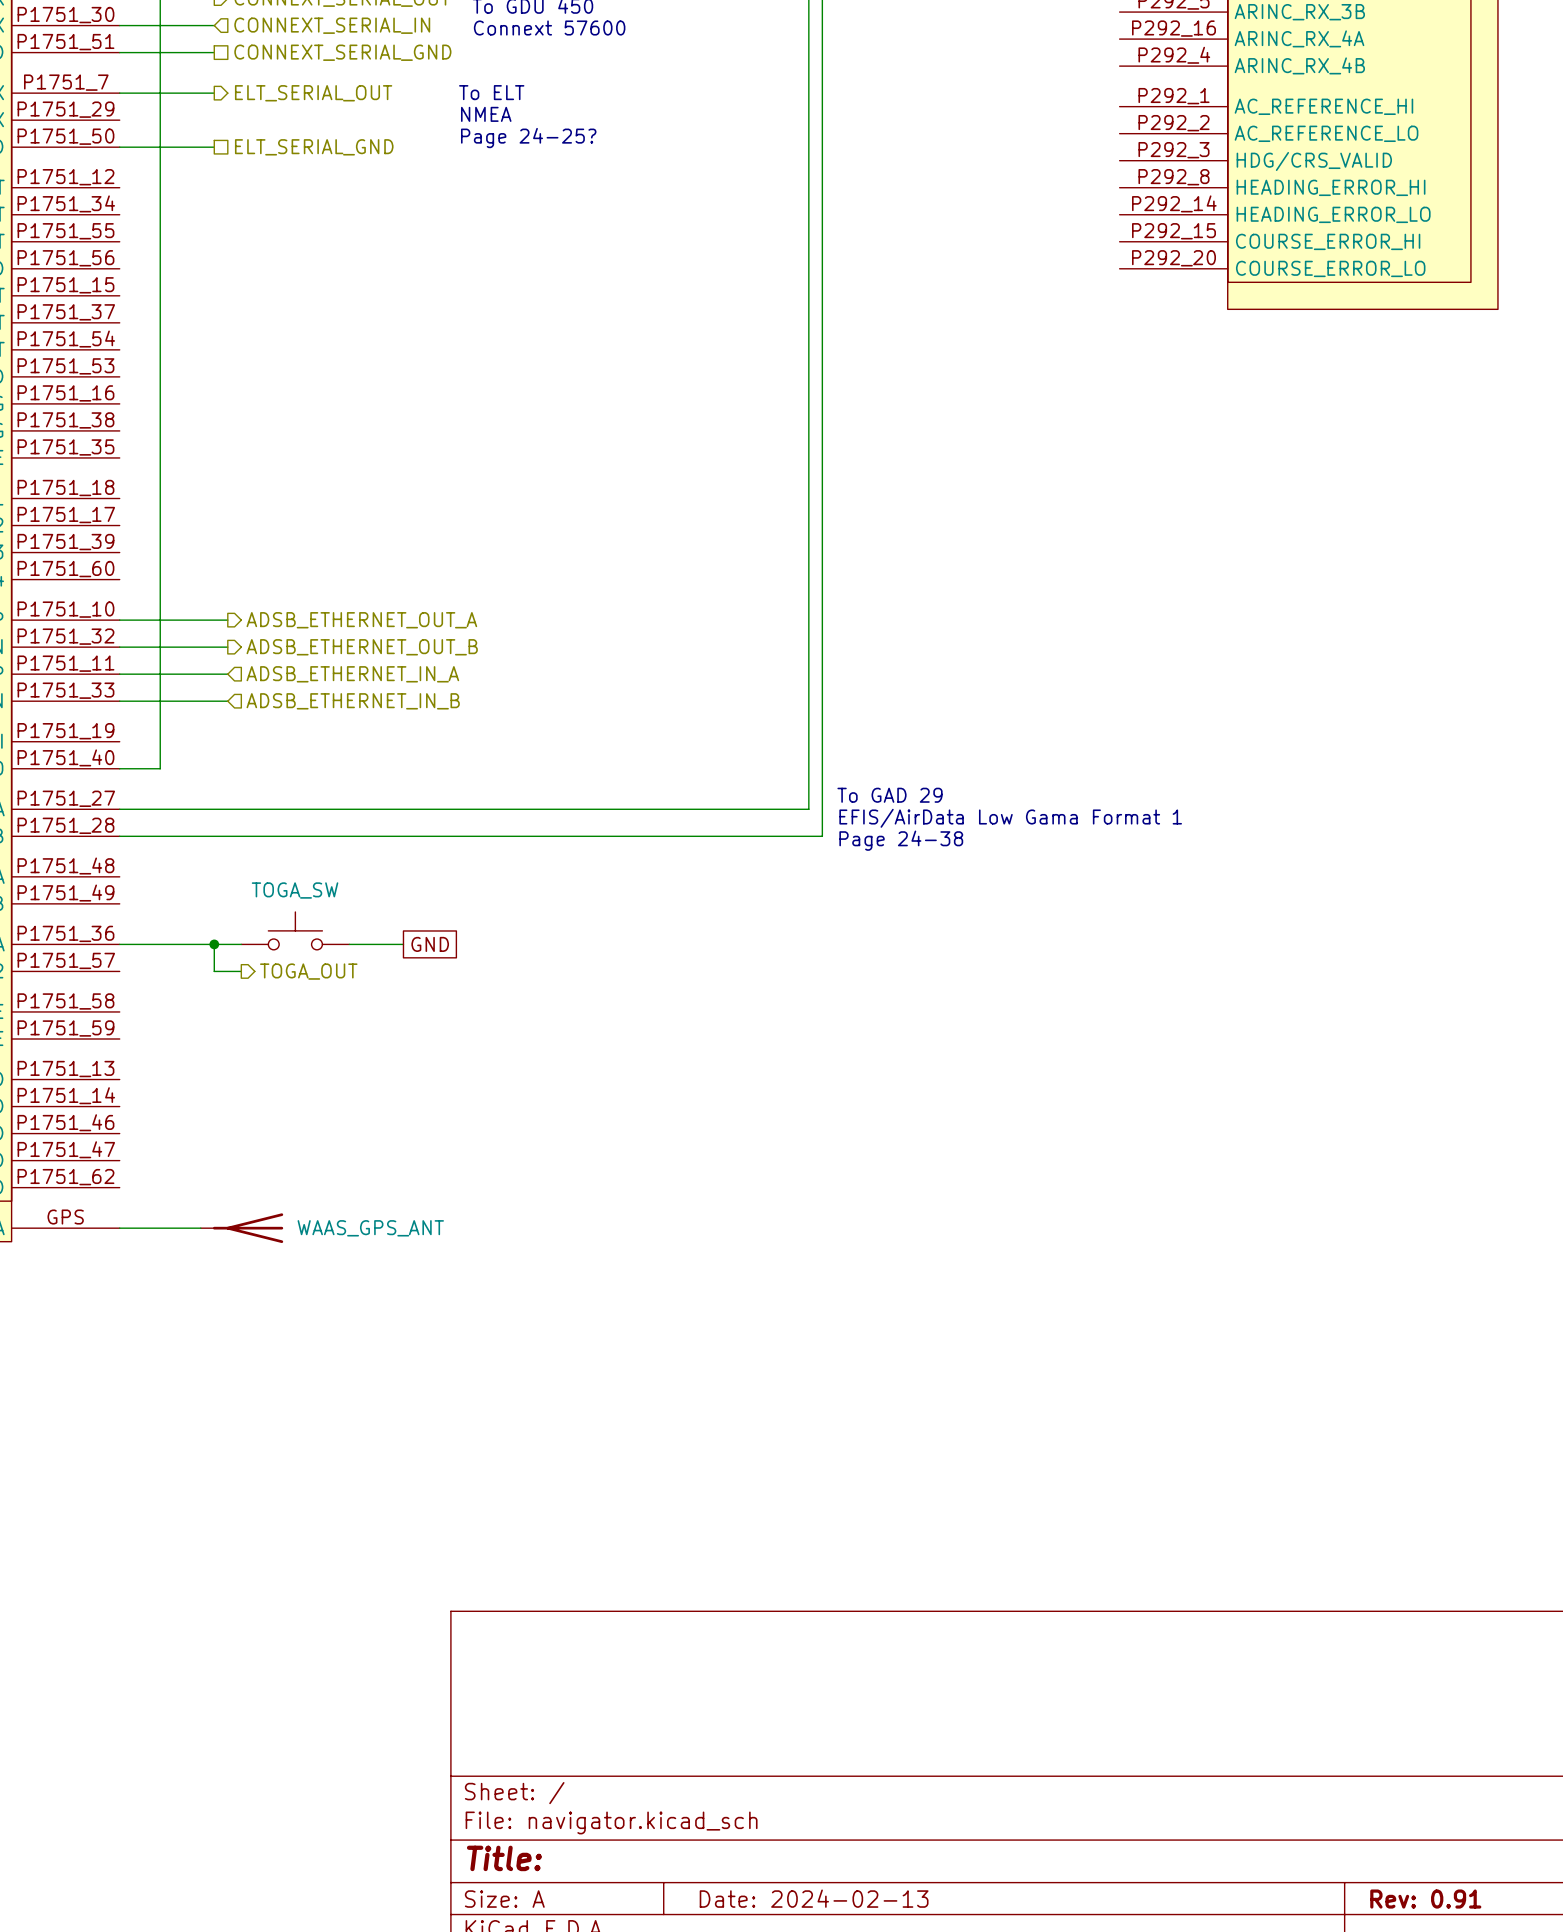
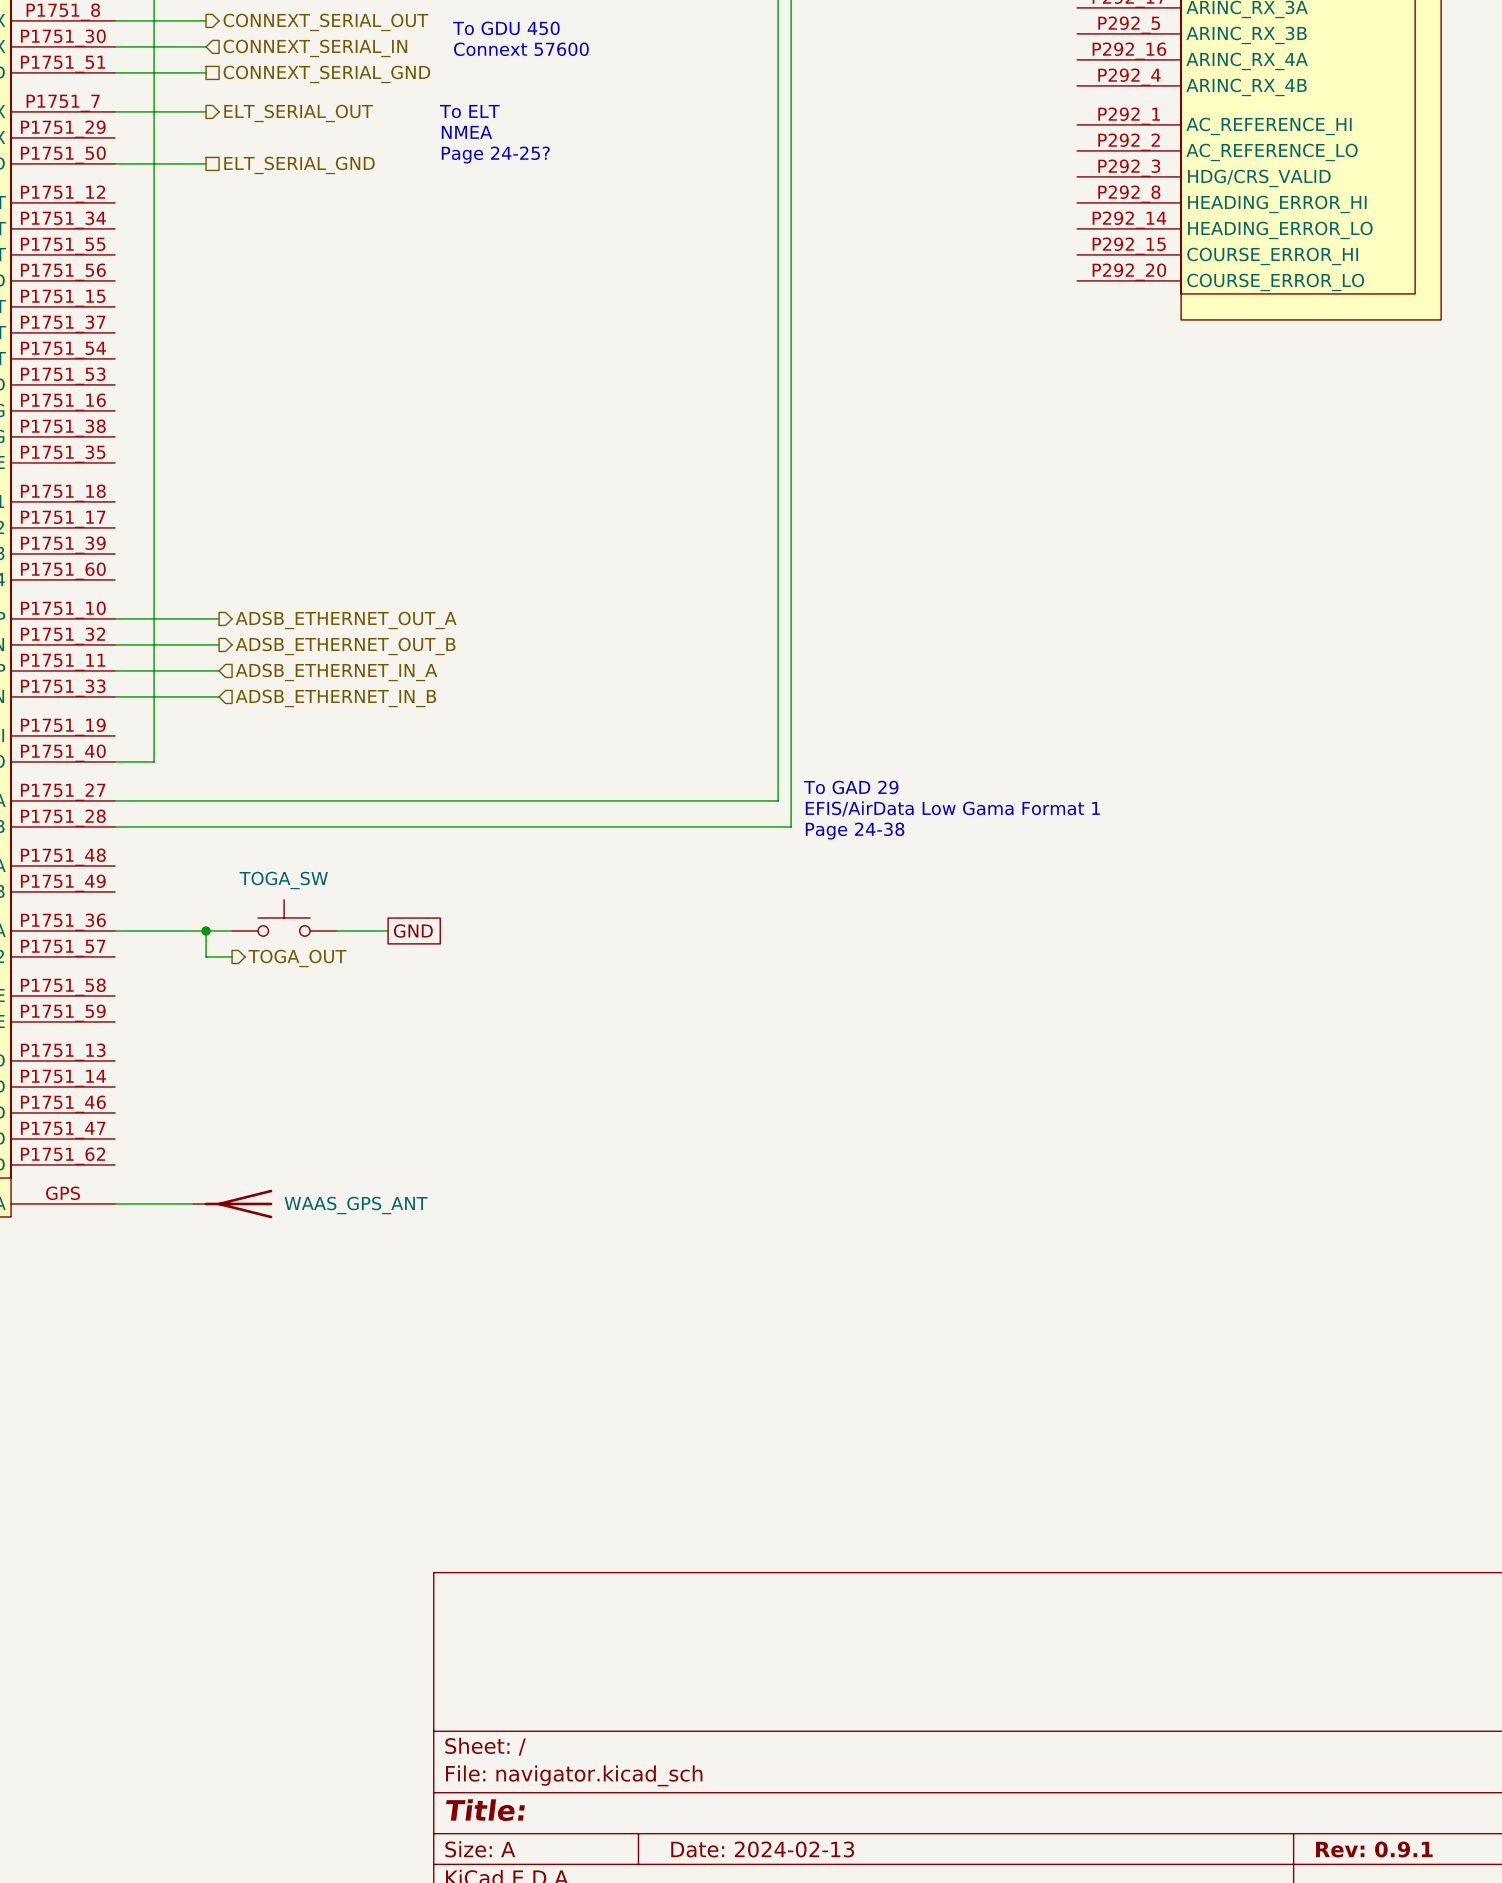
title block: Rev: 0.91 (1425, 1899) -> Rev: 0.9.1 (1374, 1849)

